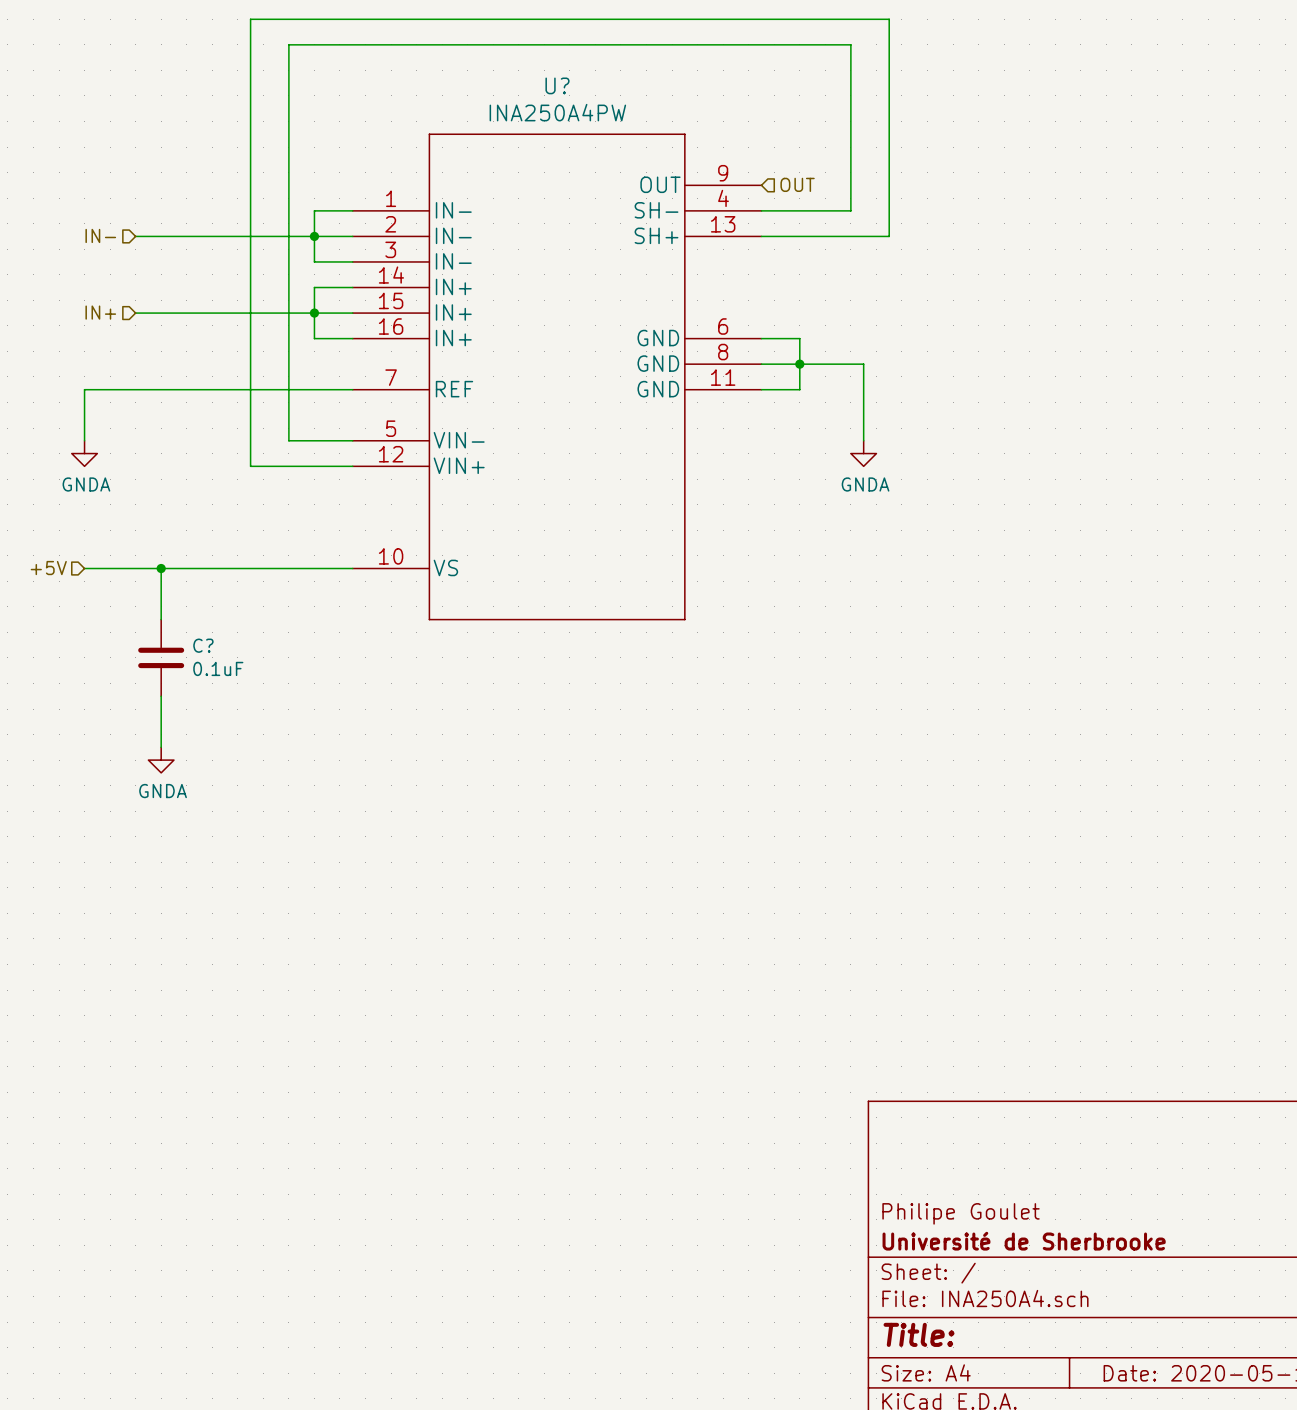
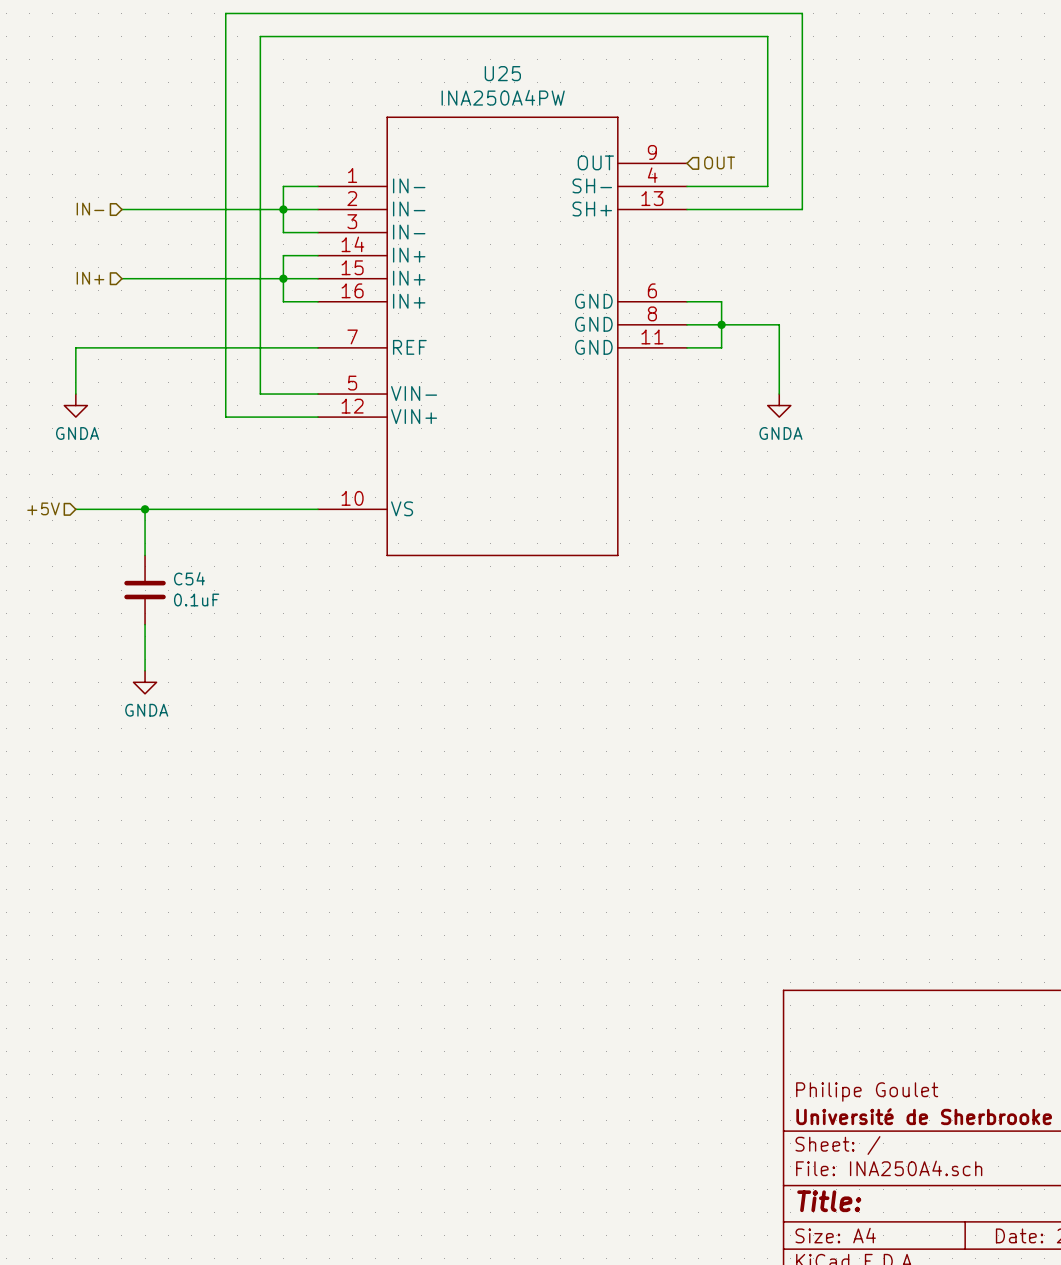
U? name: U? (557, 85) -> U25 (502, 73)
C? name: C? (203, 645) -> C54 (189, 578)

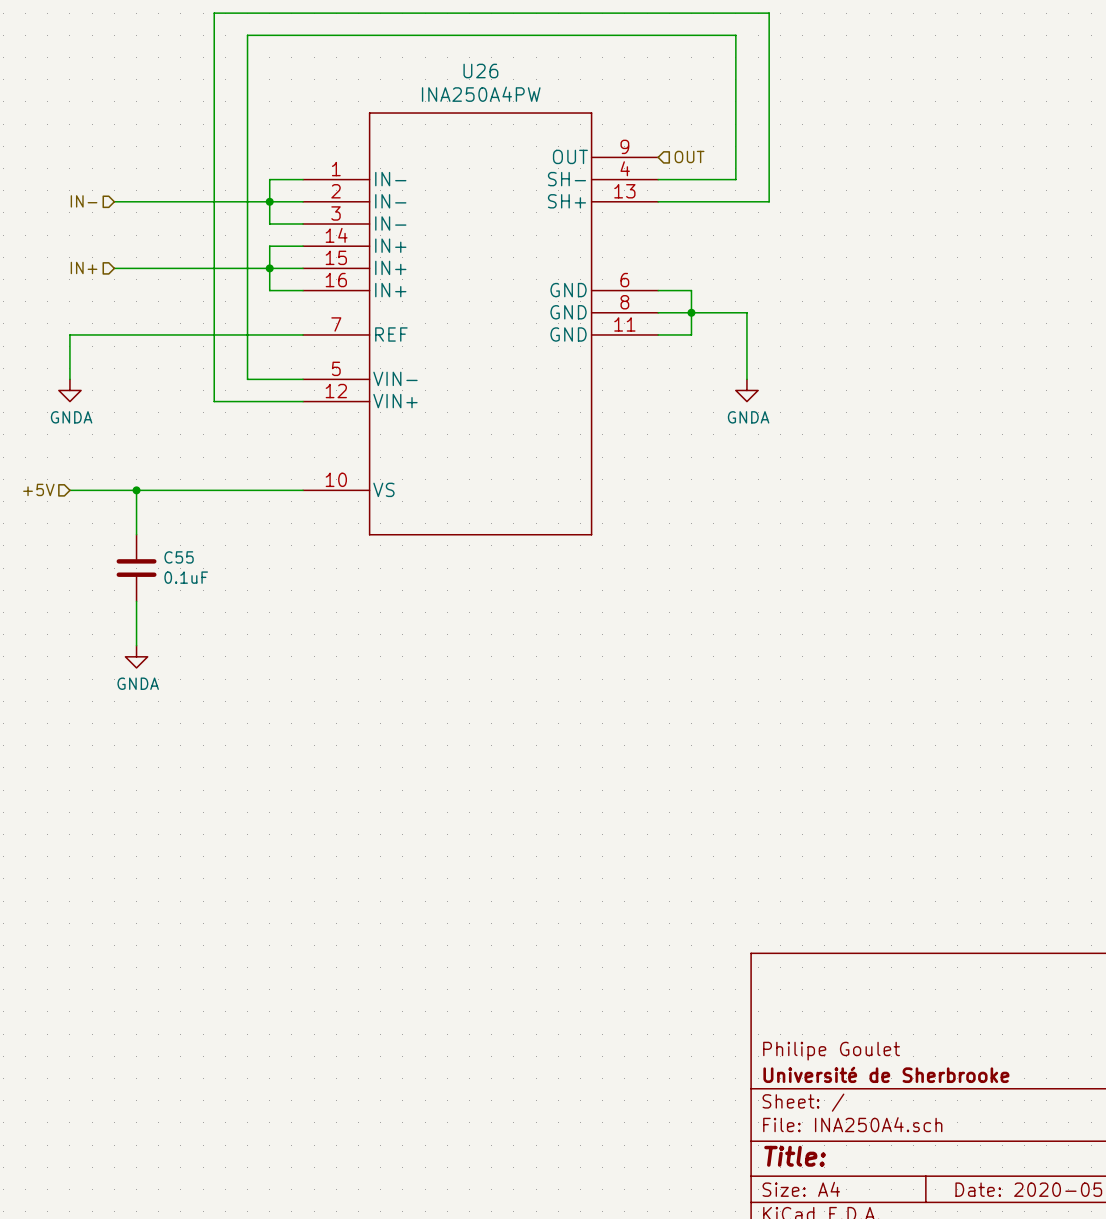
U25 name: U25 (502, 73) -> U26 (480, 71)
C54 name: C54 (189, 578) -> C55 (179, 557)

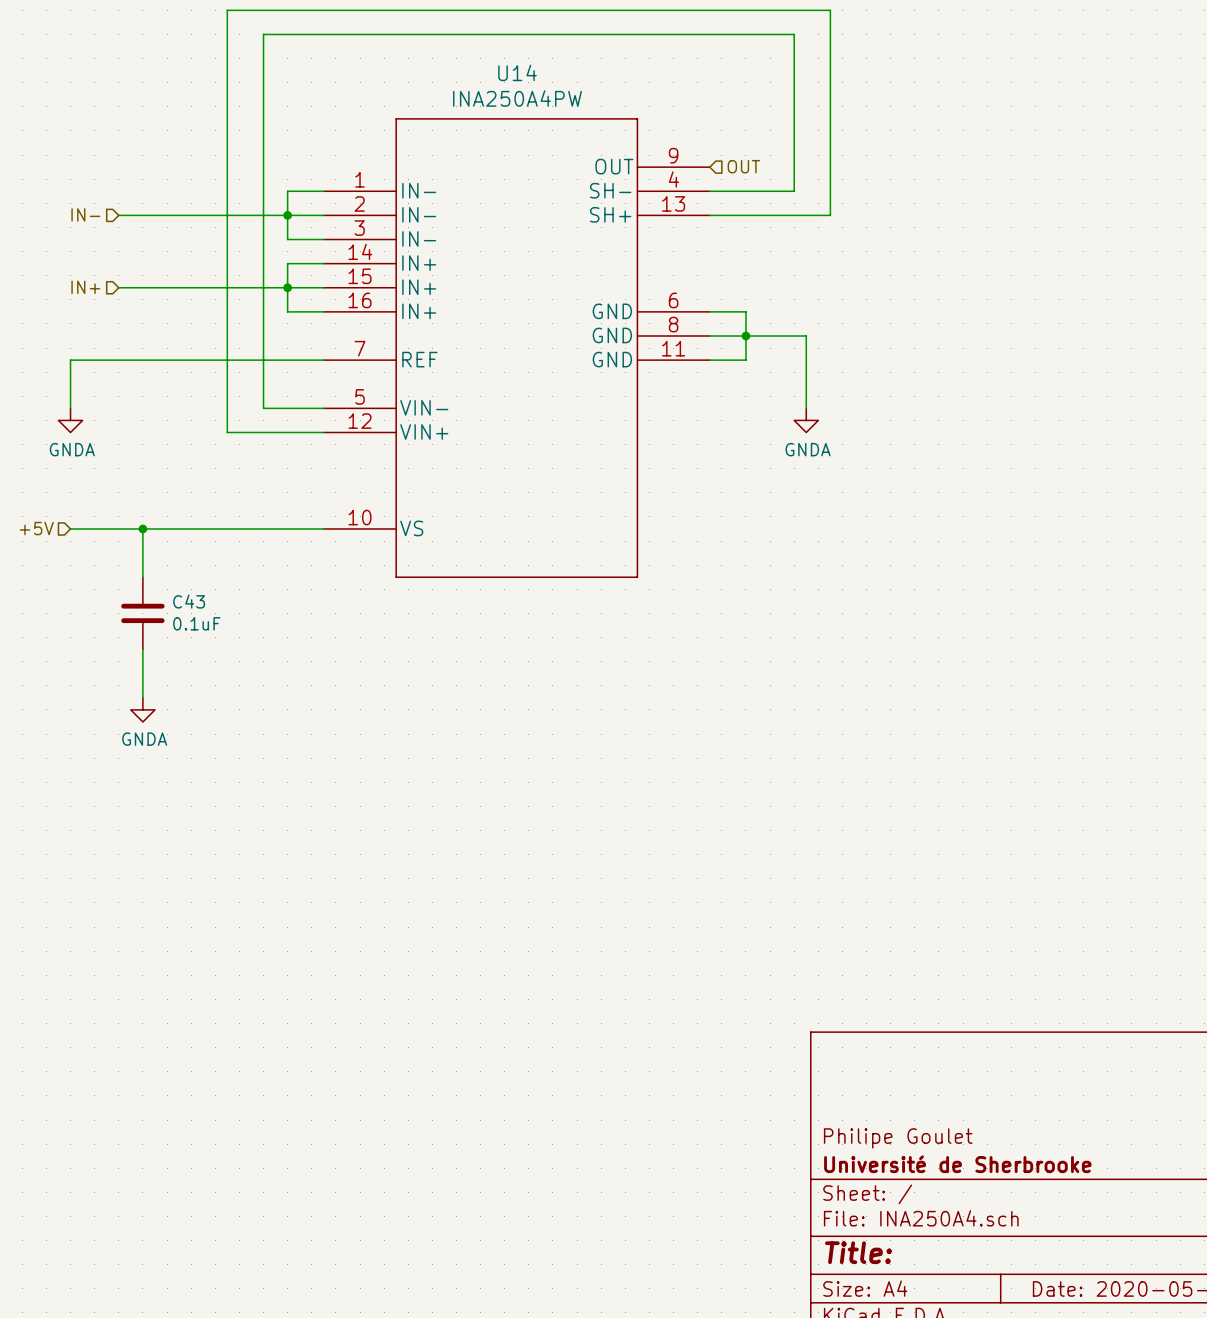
U26 name: U26 (480, 71) -> U14 (517, 72)
C55 name: C55 (179, 557) -> C43 (189, 601)

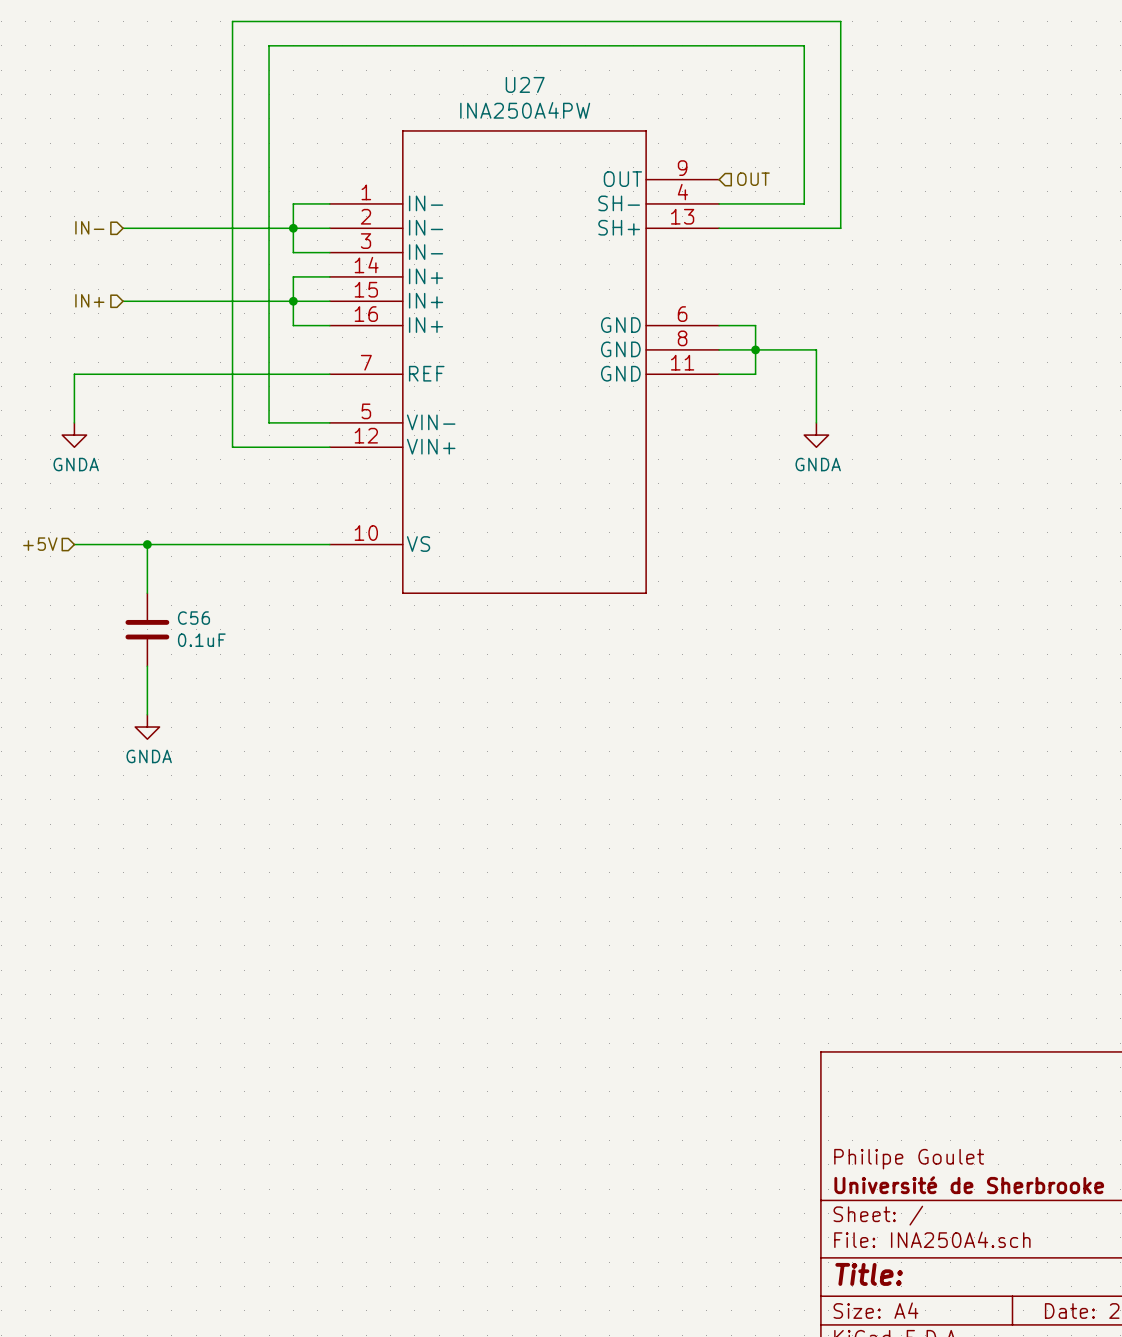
U14 name: U14 (517, 72) -> U27 (525, 84)
C43 name: C43 (189, 601) -> C56 (193, 618)

